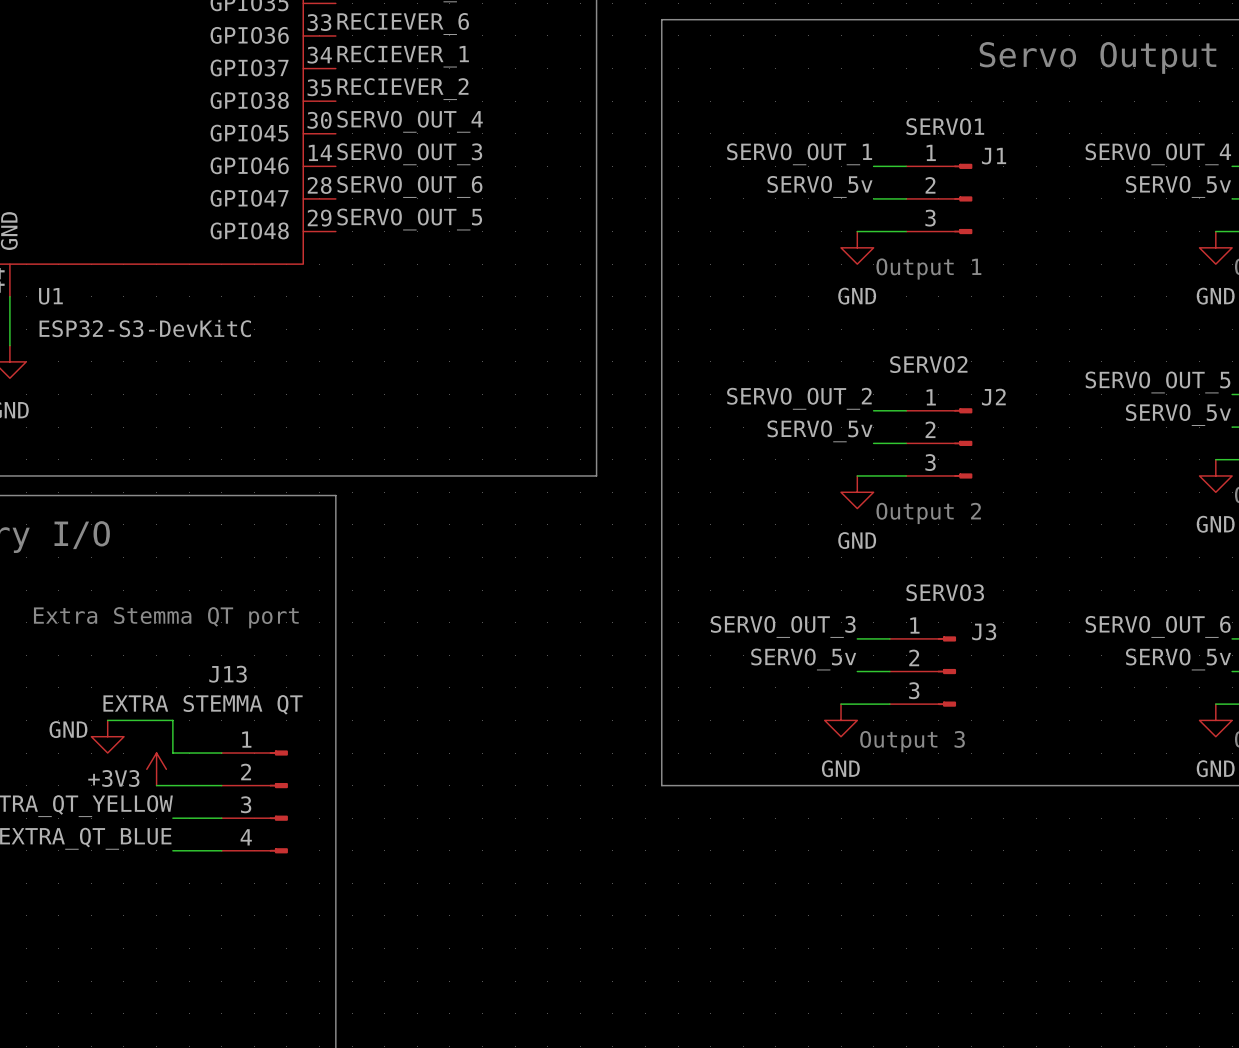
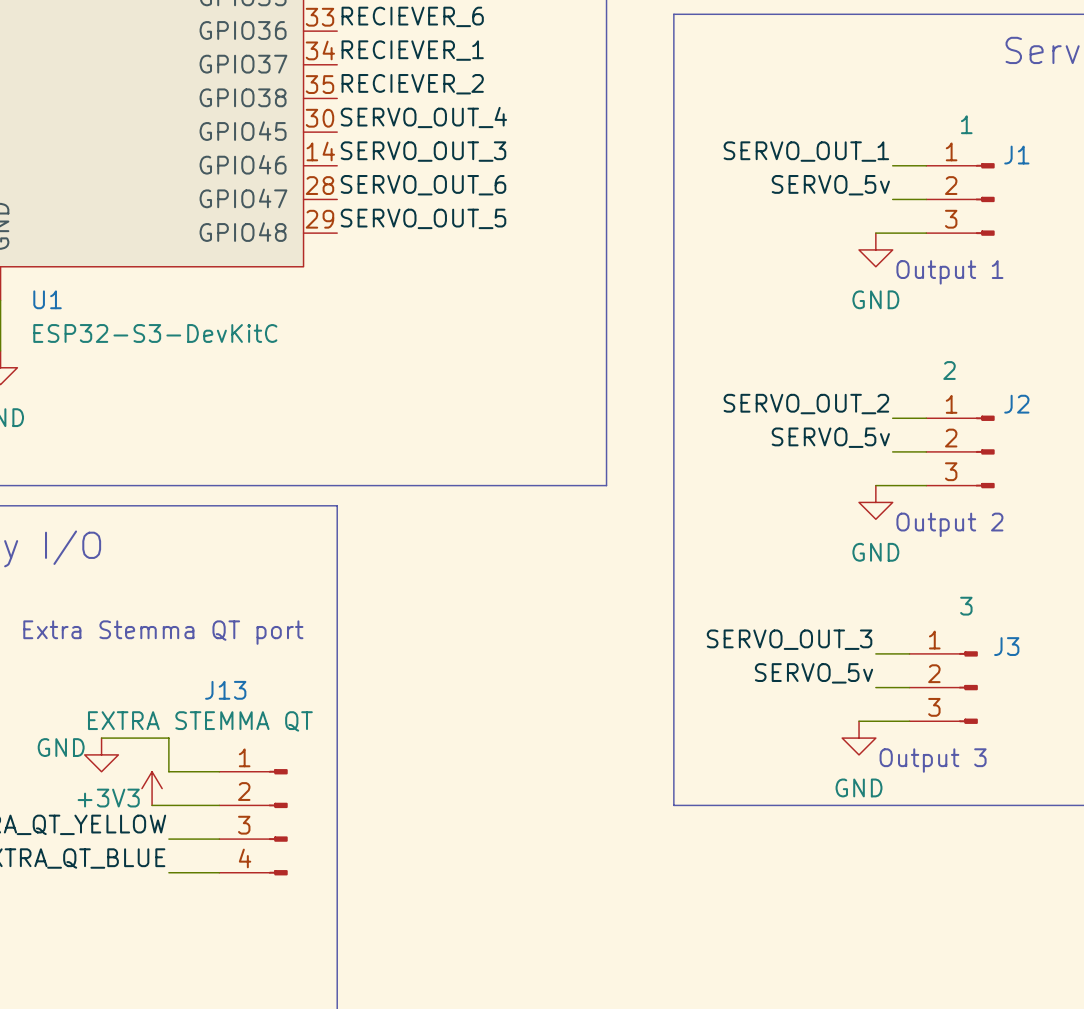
J1 value: SERVO1 (945, 126) -> 1 (966, 124)
J2 value: SERVO2 (928, 364) -> 2 (949, 370)
J3 value: SERVO3 (945, 592) -> 3 (966, 606)

